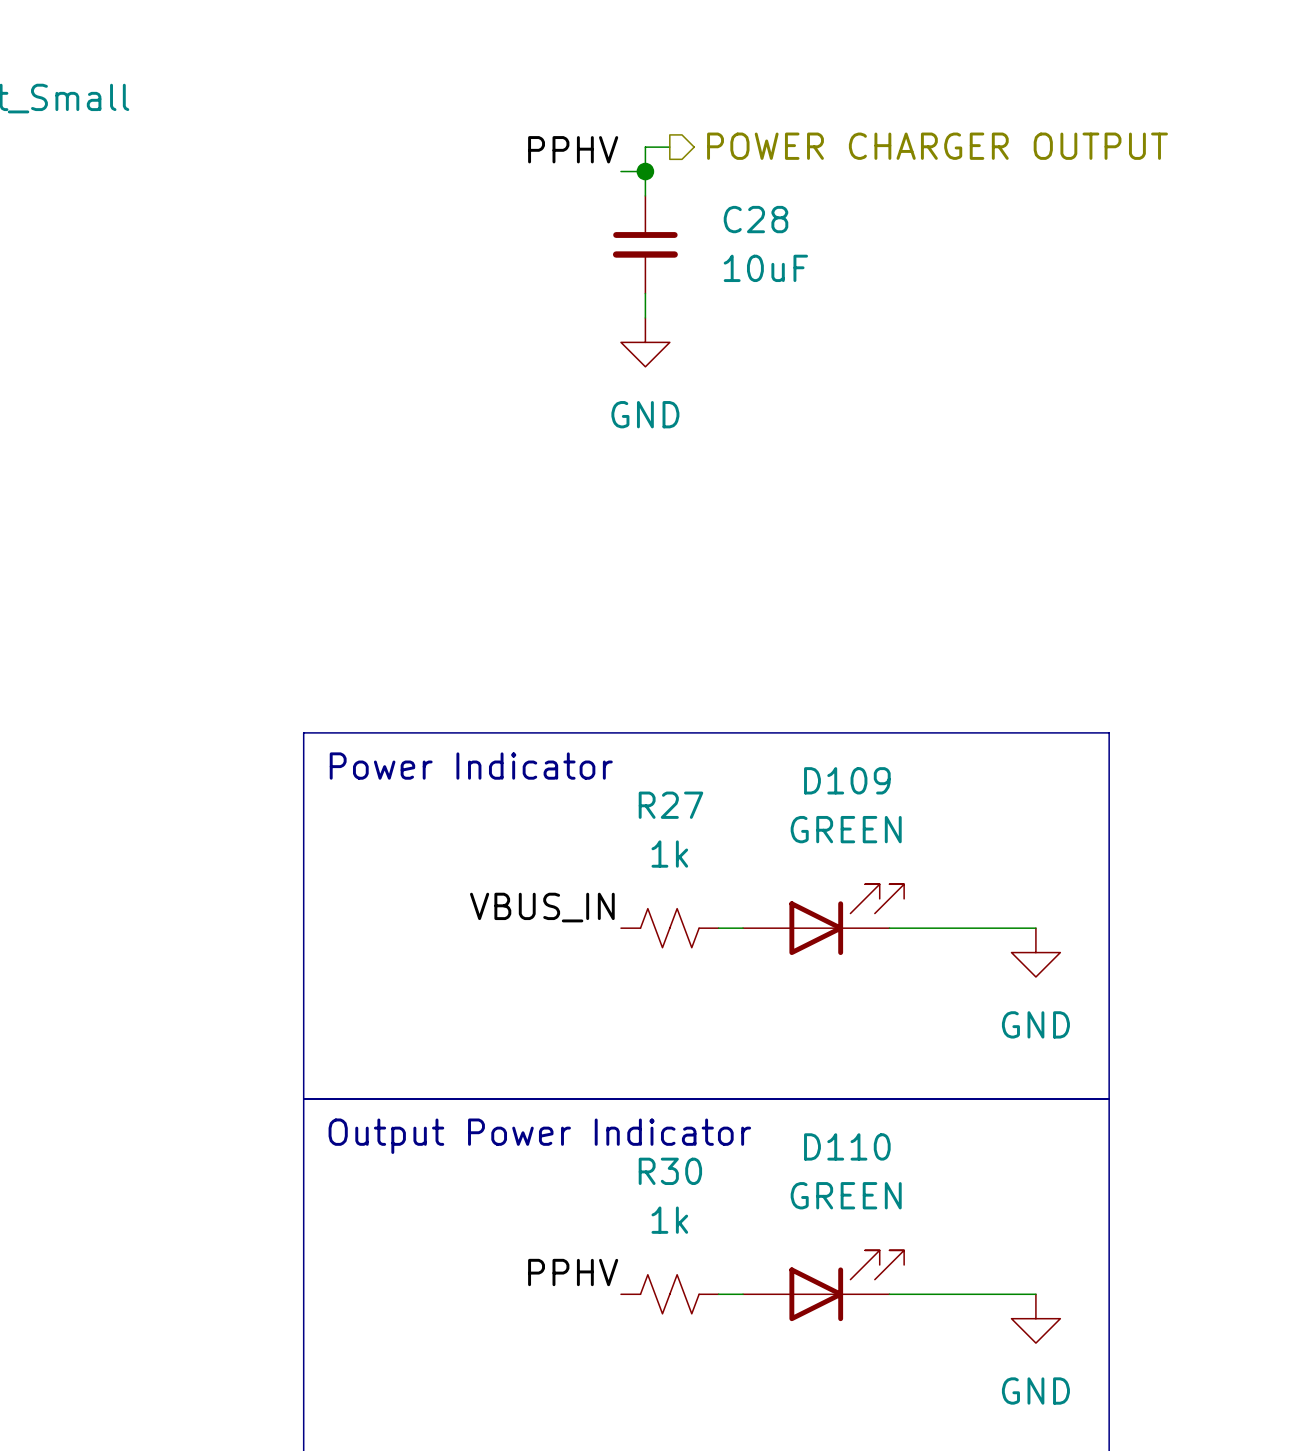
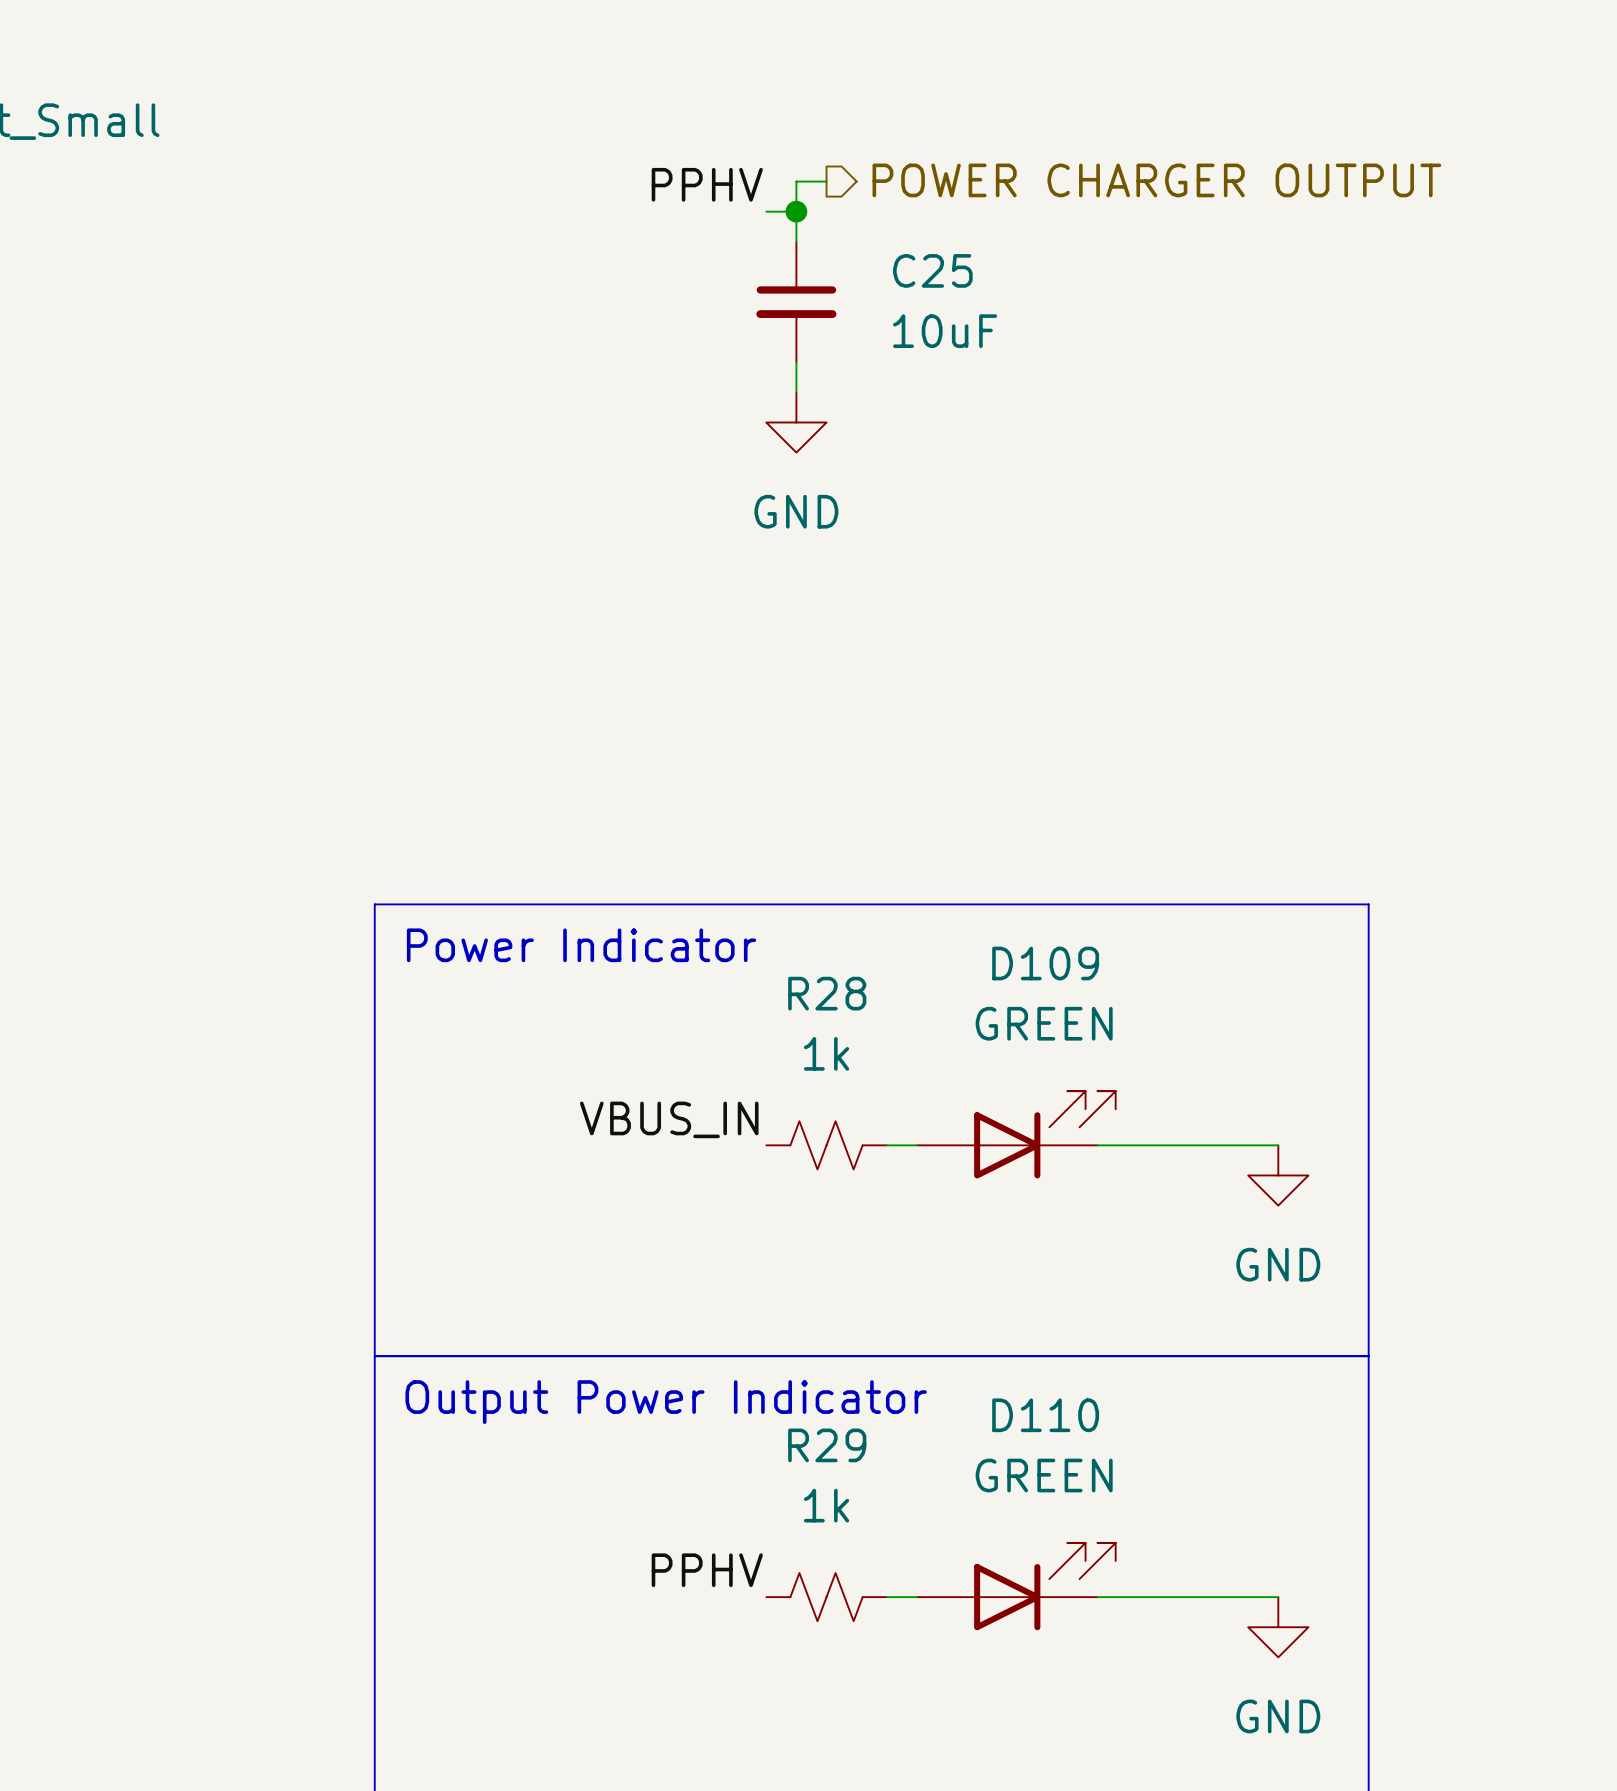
C28 name: C28 (756, 219) -> C25 (932, 270)
R27 name: R27 (670, 805) -> R28 (827, 993)
R30 name: R30 (670, 1171) -> R29 (827, 1445)

